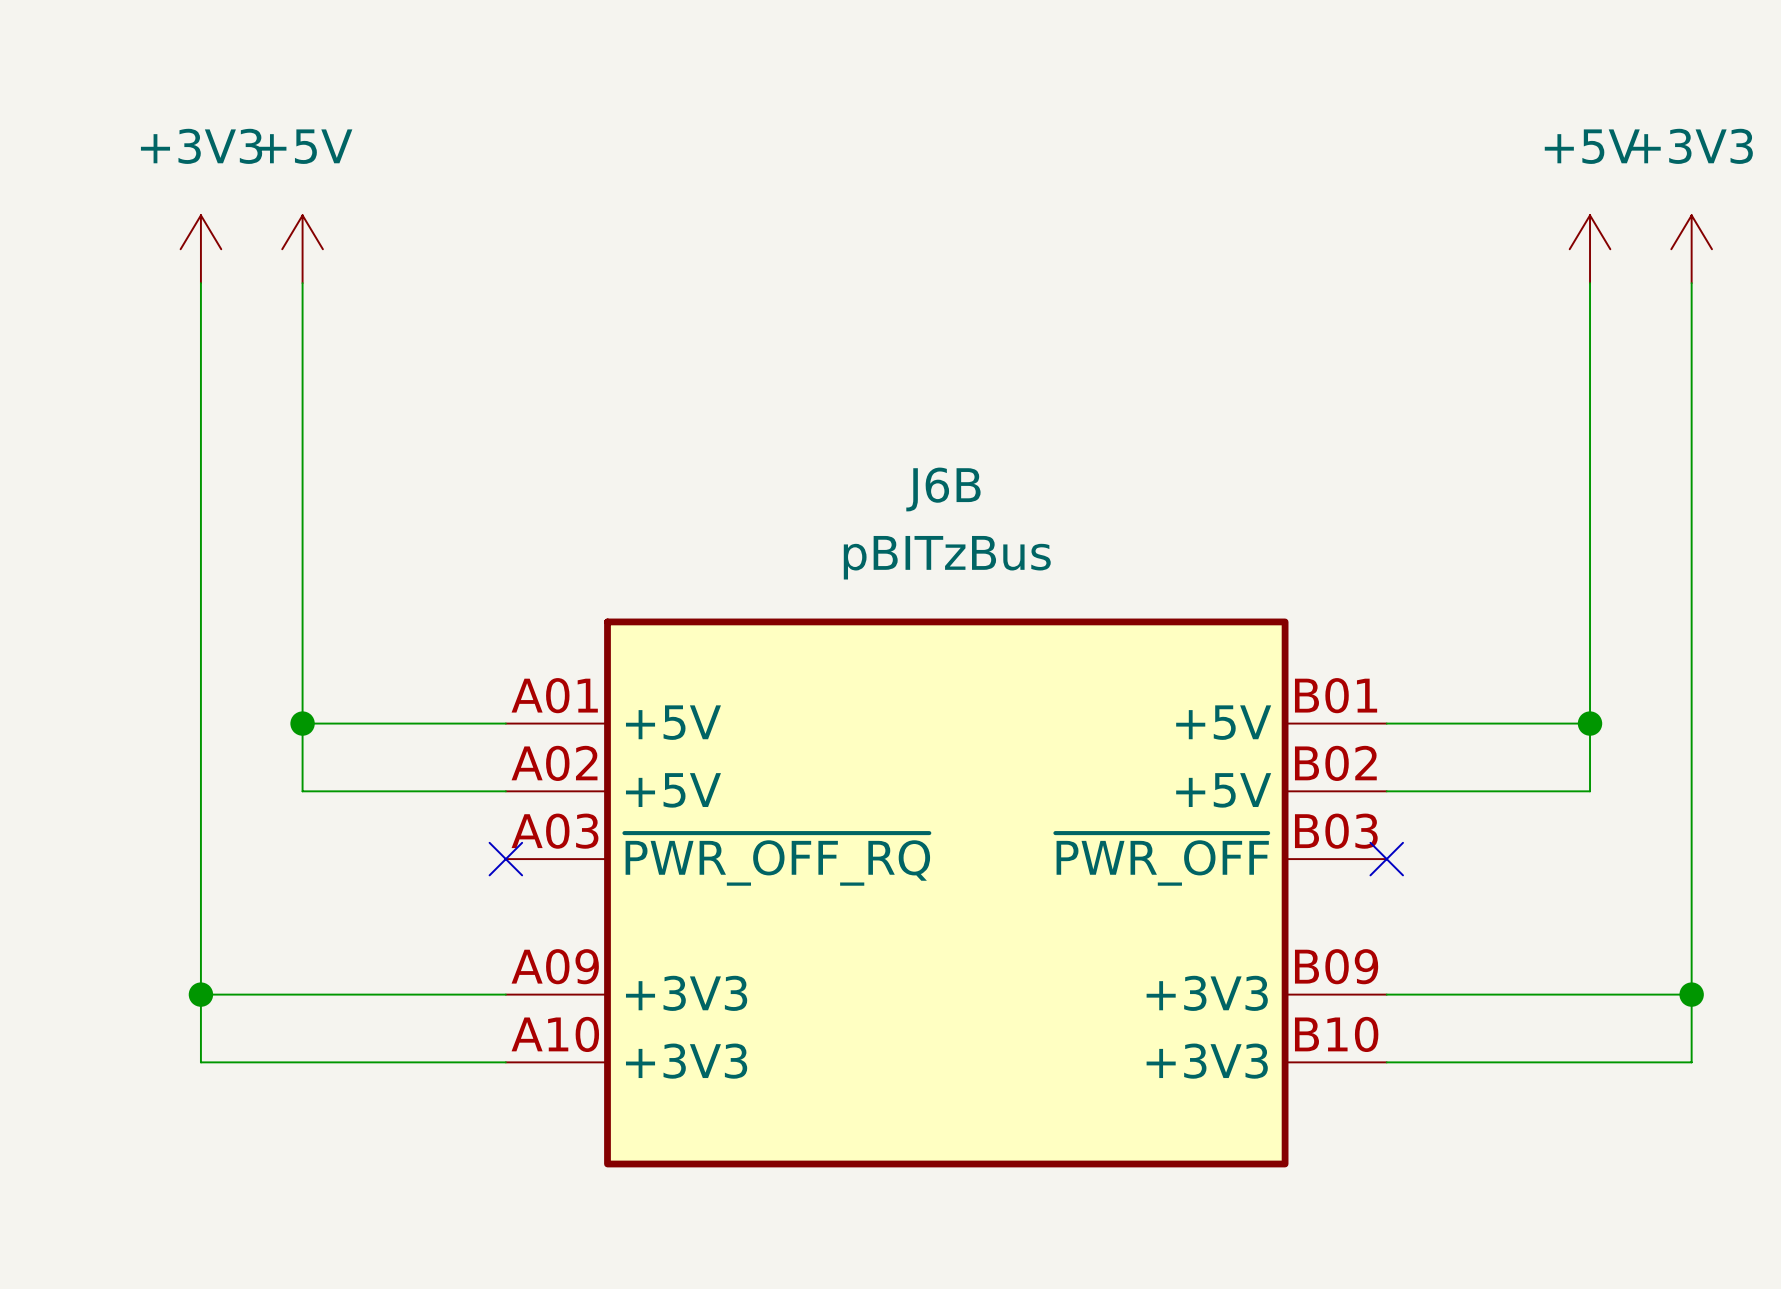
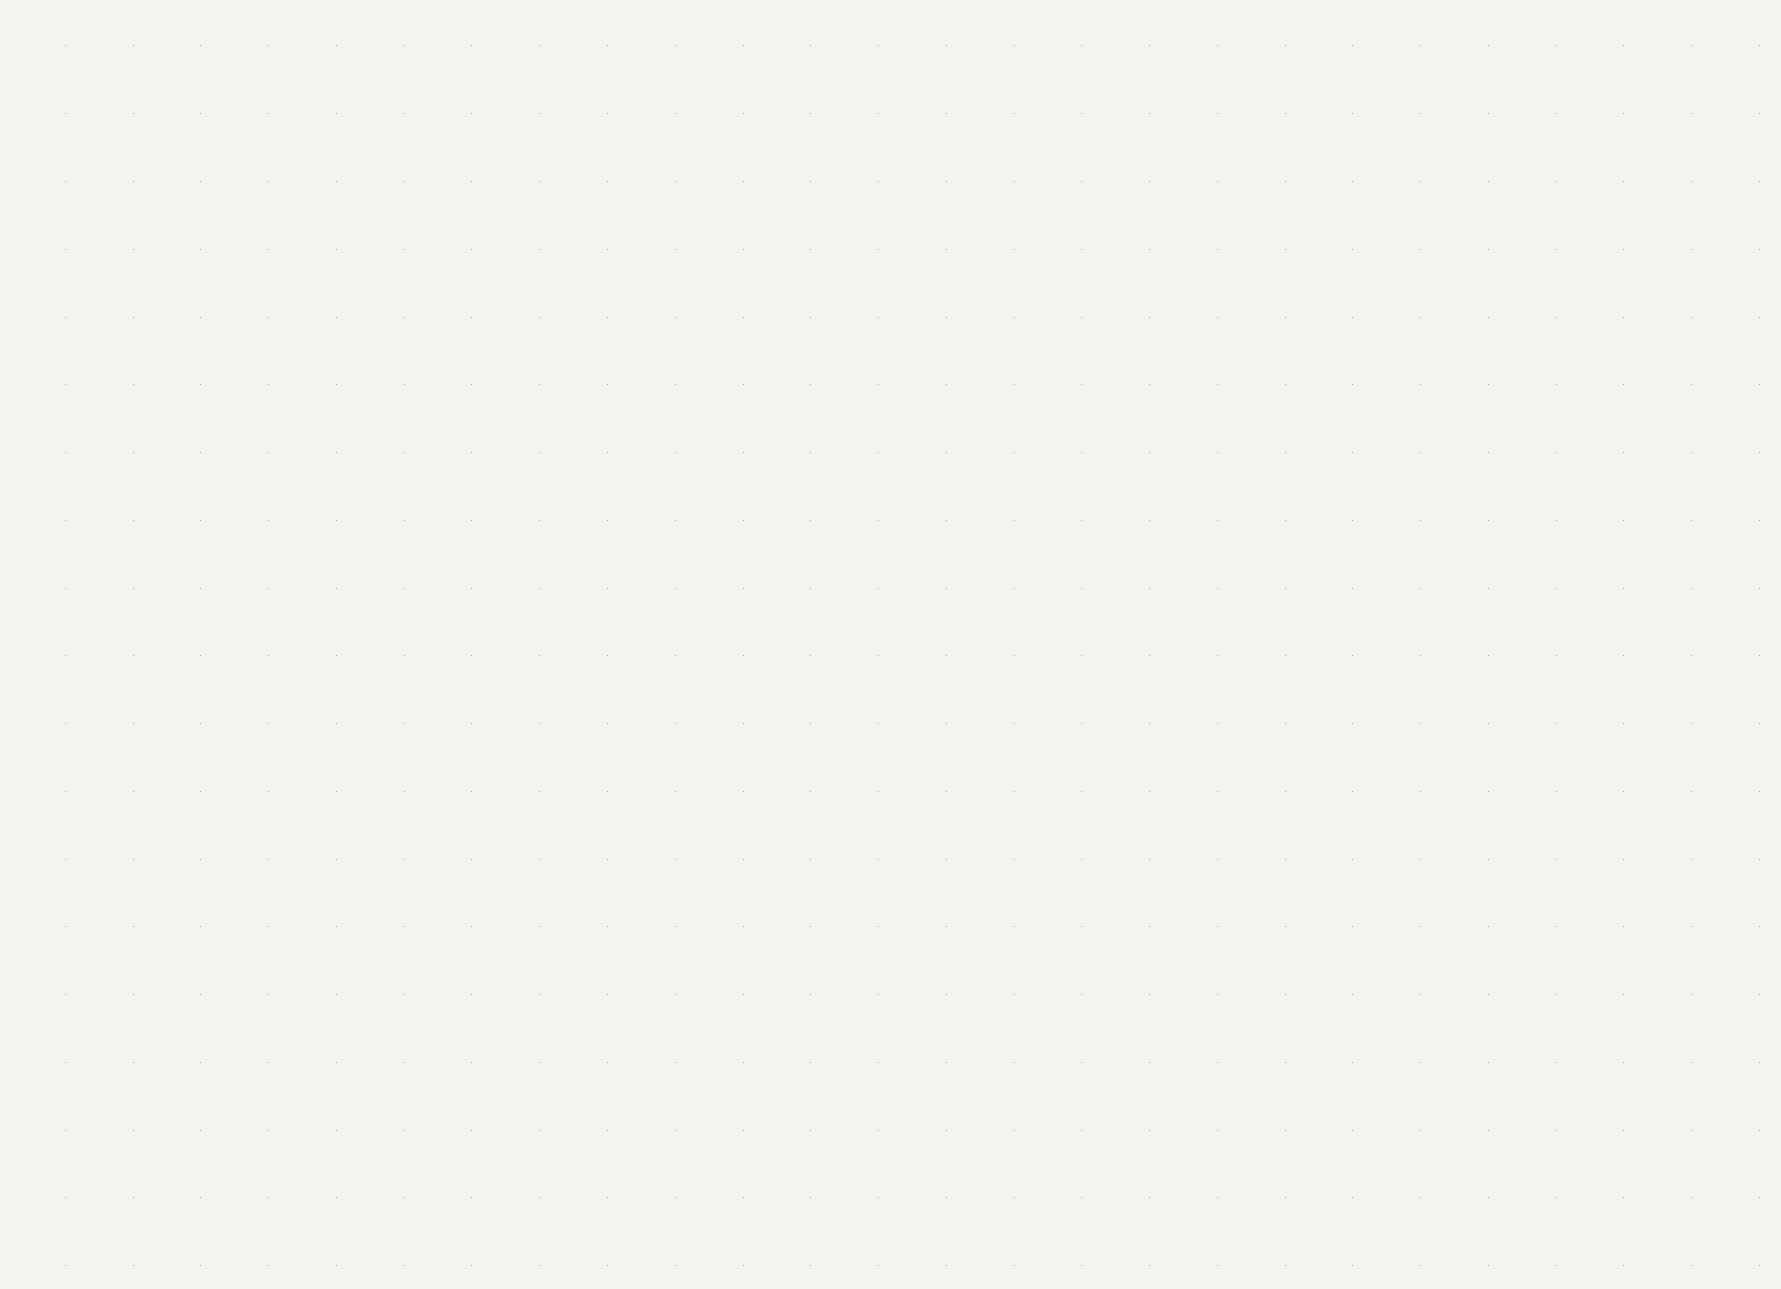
power symbol: +3V3 (200, 249) -> none
power symbol: +5V (302, 249) -> none
power symbol: +5V (1590, 249) -> none
power symbol: +3V3 (1691, 249) -> none
wire: (200, 283) (200, 1062) (505, 1062) -> none
wire: (302, 283) (302, 791) (505, 791) -> none
wire: (1590, 283) (1590, 791) (1386, 791) -> none
wire: (1691, 283) (1691, 1062) (1386, 1062) -> none
wire: (302, 723) (505, 723) -> none
junction: (302, 723) -> none
wire: (1386, 723) (1590, 723) -> none
junction: (1590, 723) -> none
no-connect mark: (505, 859) -> none
no-connect mark: (1386, 859) -> none
J6B: pBITzBus (946, 892) -> none
wire: (200, 994) (505, 994) -> none
junction: (200, 994) -> none
wire: (1386, 994) (1691, 994) -> none
junction: (1691, 994) -> none

